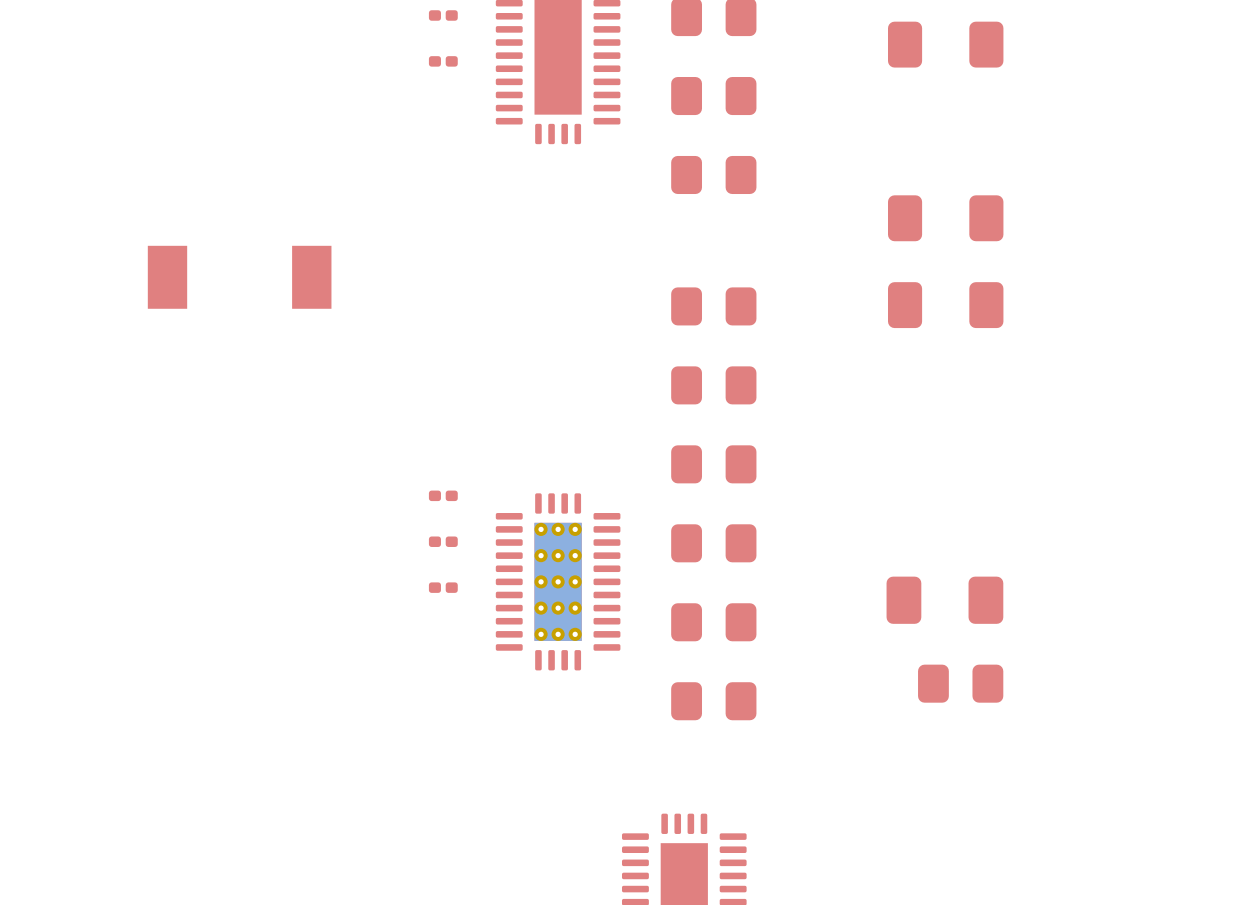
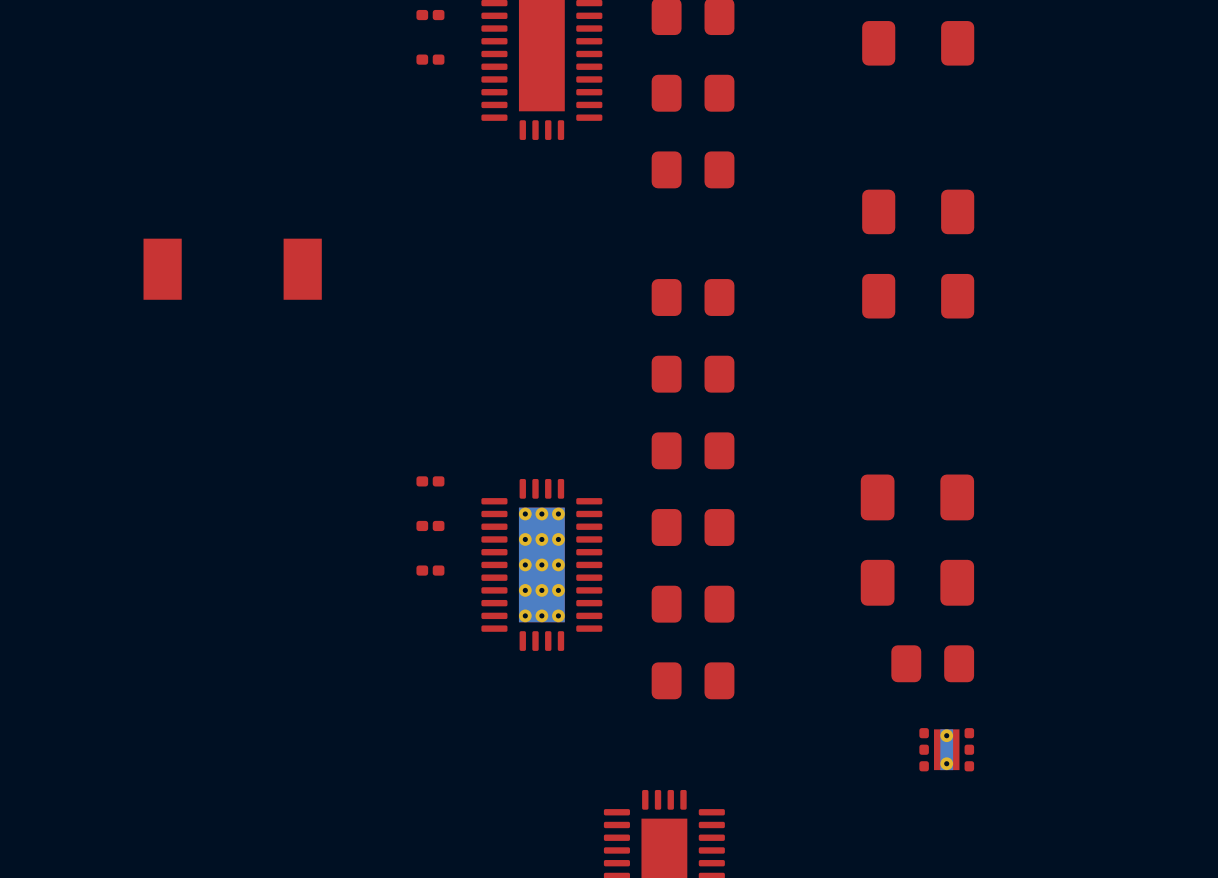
part: none -> (917, 497)
part: none -> (946, 749)

